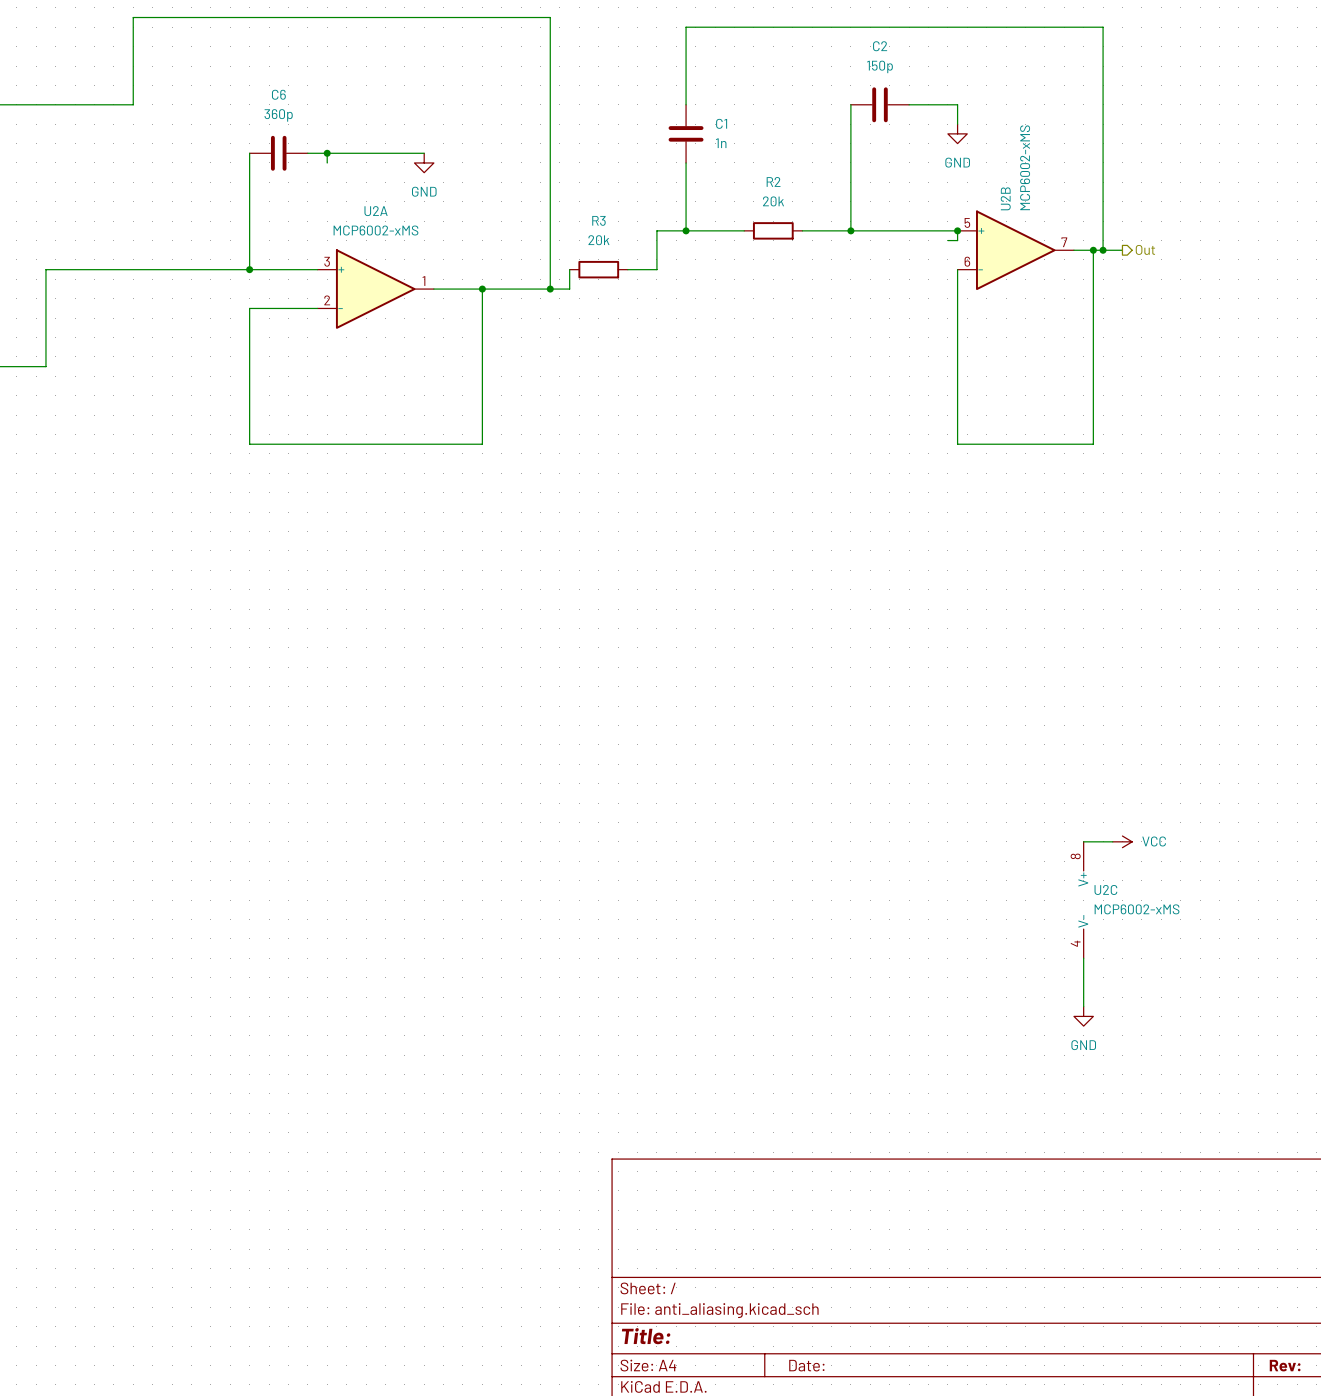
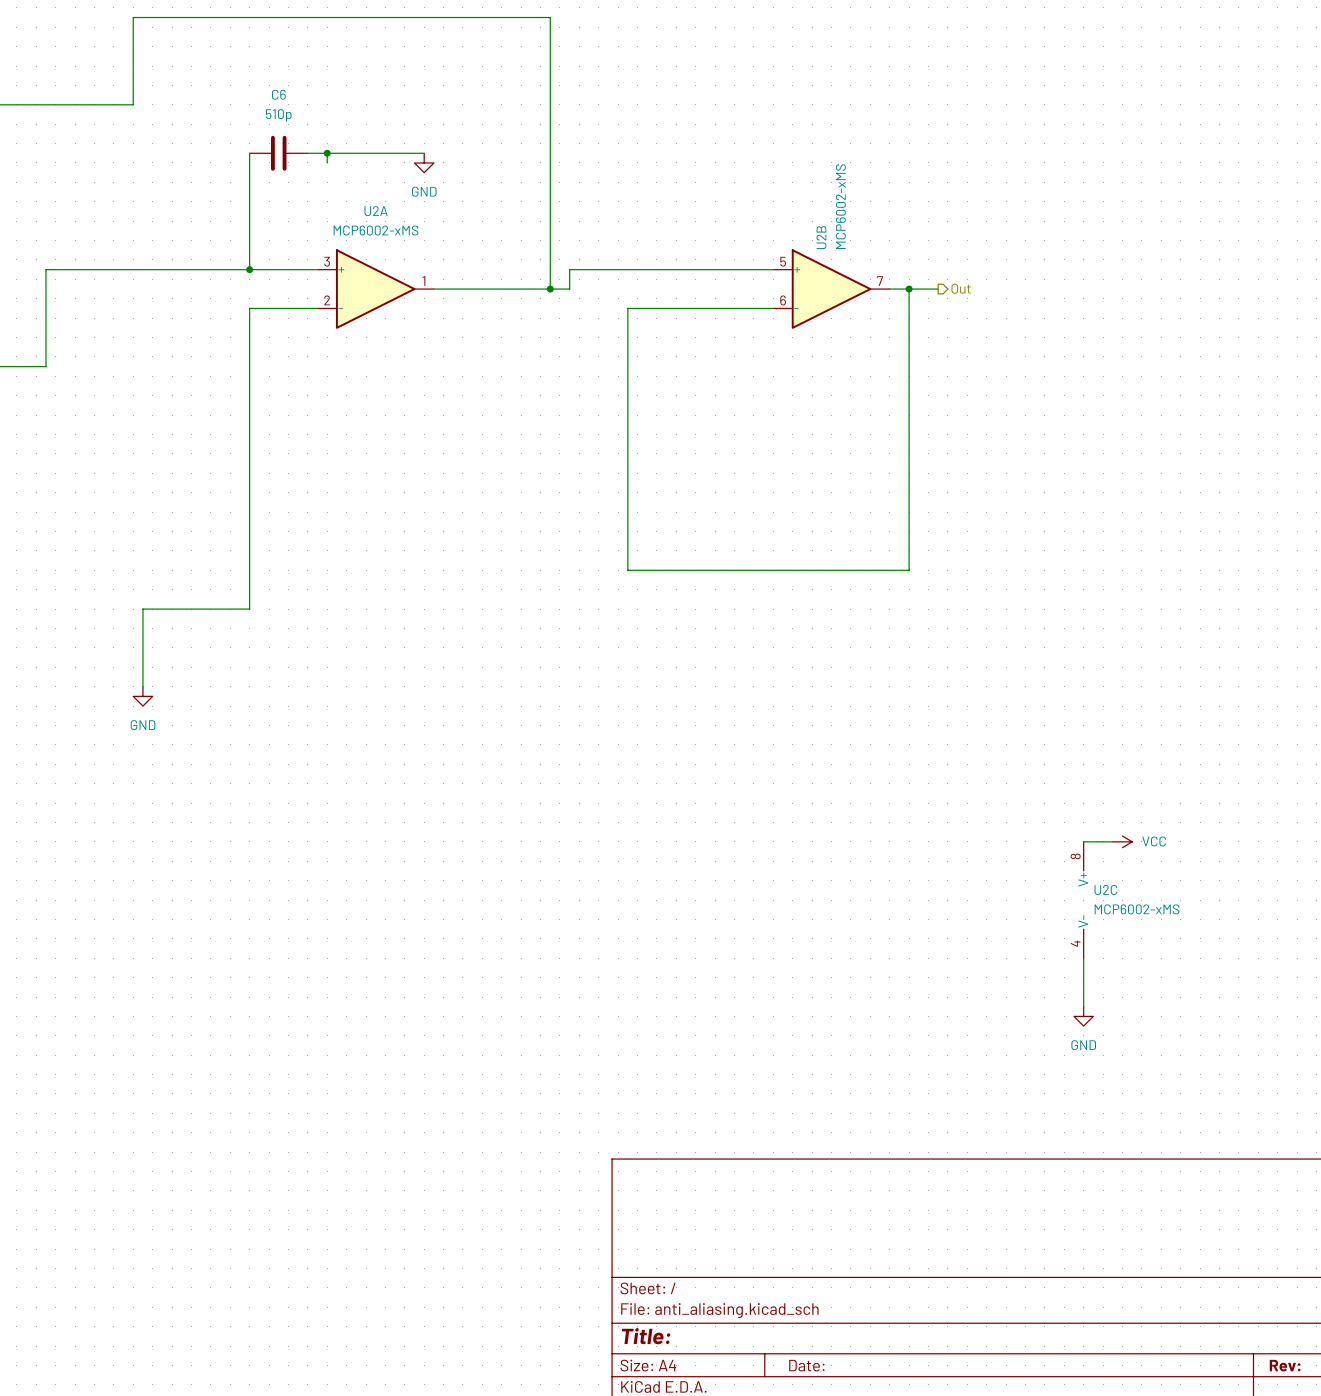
wire: (686, 104) (686, 27) (1103, 27) (1103, 250) -> none
wire: (850, 104) (850, 230) -> none
C2: 150p (880, 104) -> none
wire: (909, 104) (957, 104) (957, 124) -> none
C6 value: 360p (278, 115) -> 510p (278, 115)
C1: 1n (686, 133) -> none
power symbol: GND (957, 133) -> none
wire: (686, 162) (686, 230) -> none
junction: (686, 230) -> none
wire: (744, 230) (656, 230) (656, 269) -> (773, 269) (656, 269)
R2: 20k (773, 230) -> none
wire: (802, 230) (957, 230) (957, 240) (947, 240) -> none
junction: (850, 230) -> none
junction: (957, 230) -> none
hierarchical label position: Out (1145, 249) -> Out (961, 288)
U2B position: (1015, 250) -> (831, 289)
wire: (1073, 250) (1122, 250) -> (889, 289) (938, 289)
wire: (1093, 250) (1093, 444) (957, 444) (957, 269) -> none
junction: (1093, 250) -> none
junction: (1103, 250) -> none
wire: none -> (569, 269) (627, 269)
R3: 20k (598, 269) -> none
wire: (482, 289) (482, 444) (249, 444) -> (142, 686) (142, 609) (249, 609) (249, 444)
junction: (482, 289) -> none
wire: none -> (909, 289) (909, 570) (627, 570) (627, 308) (773, 308)
junction: none -> (909, 289)
power symbol: none -> GND (142, 696)

